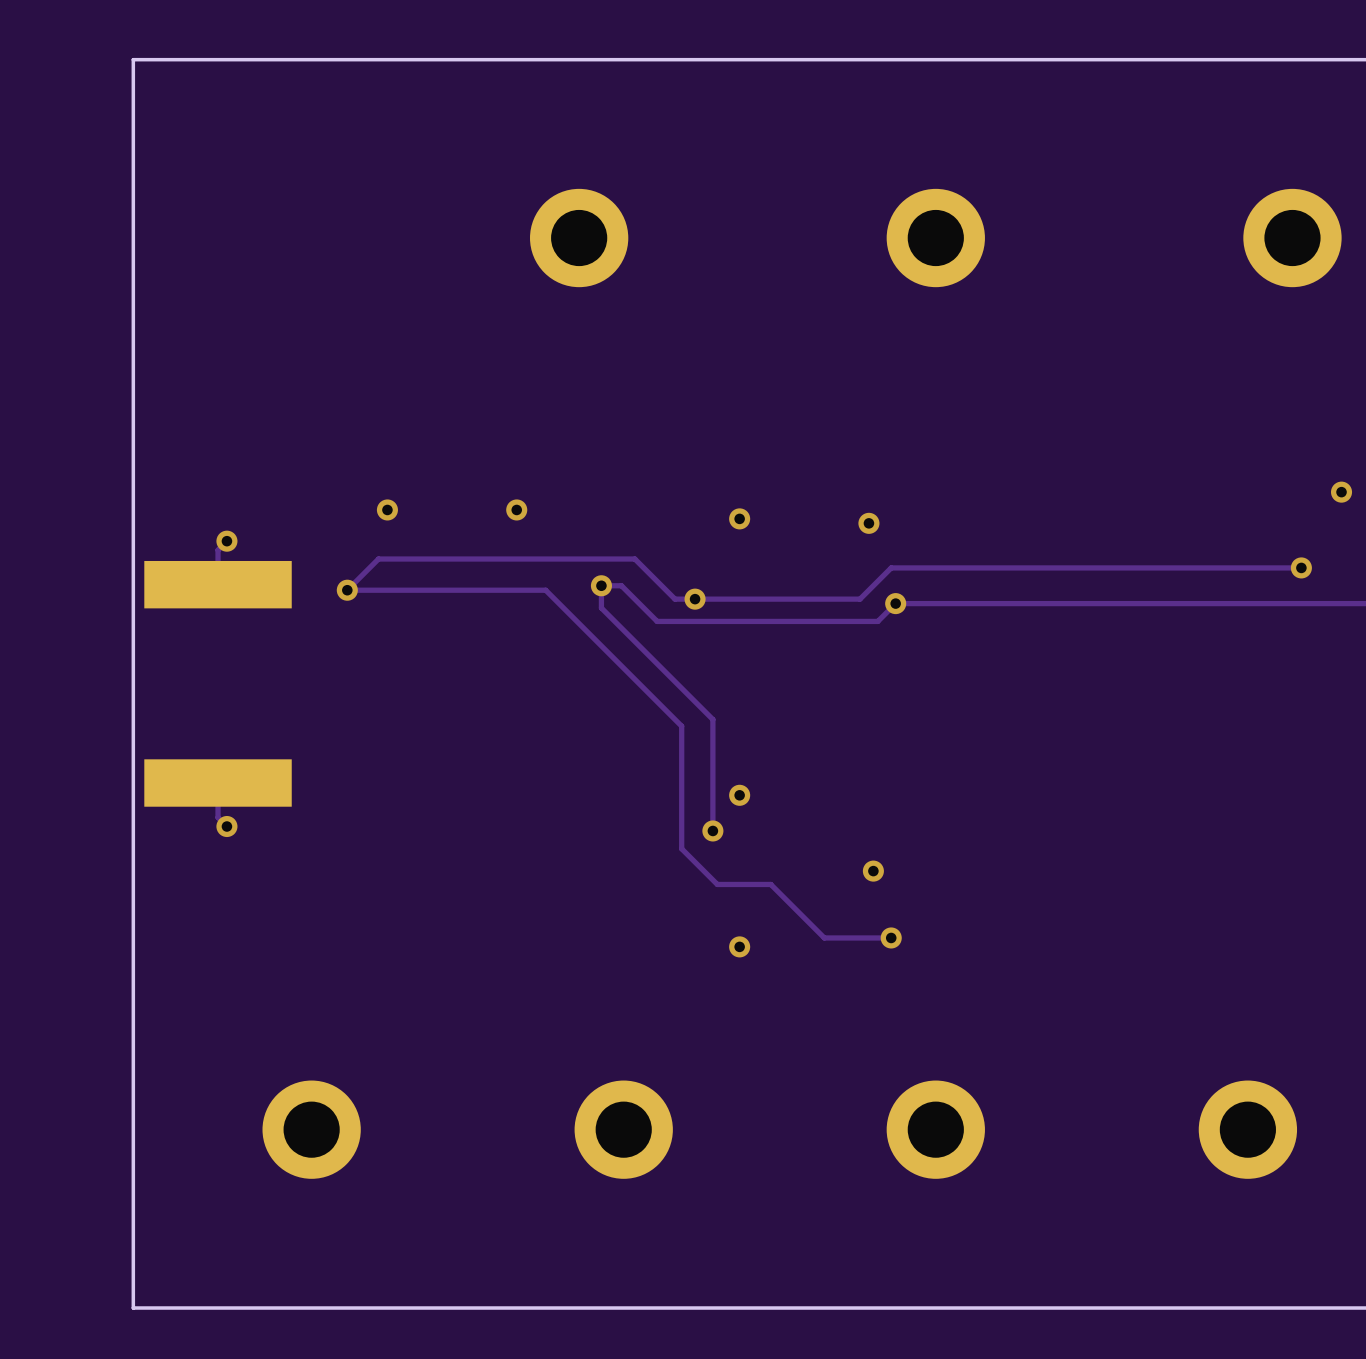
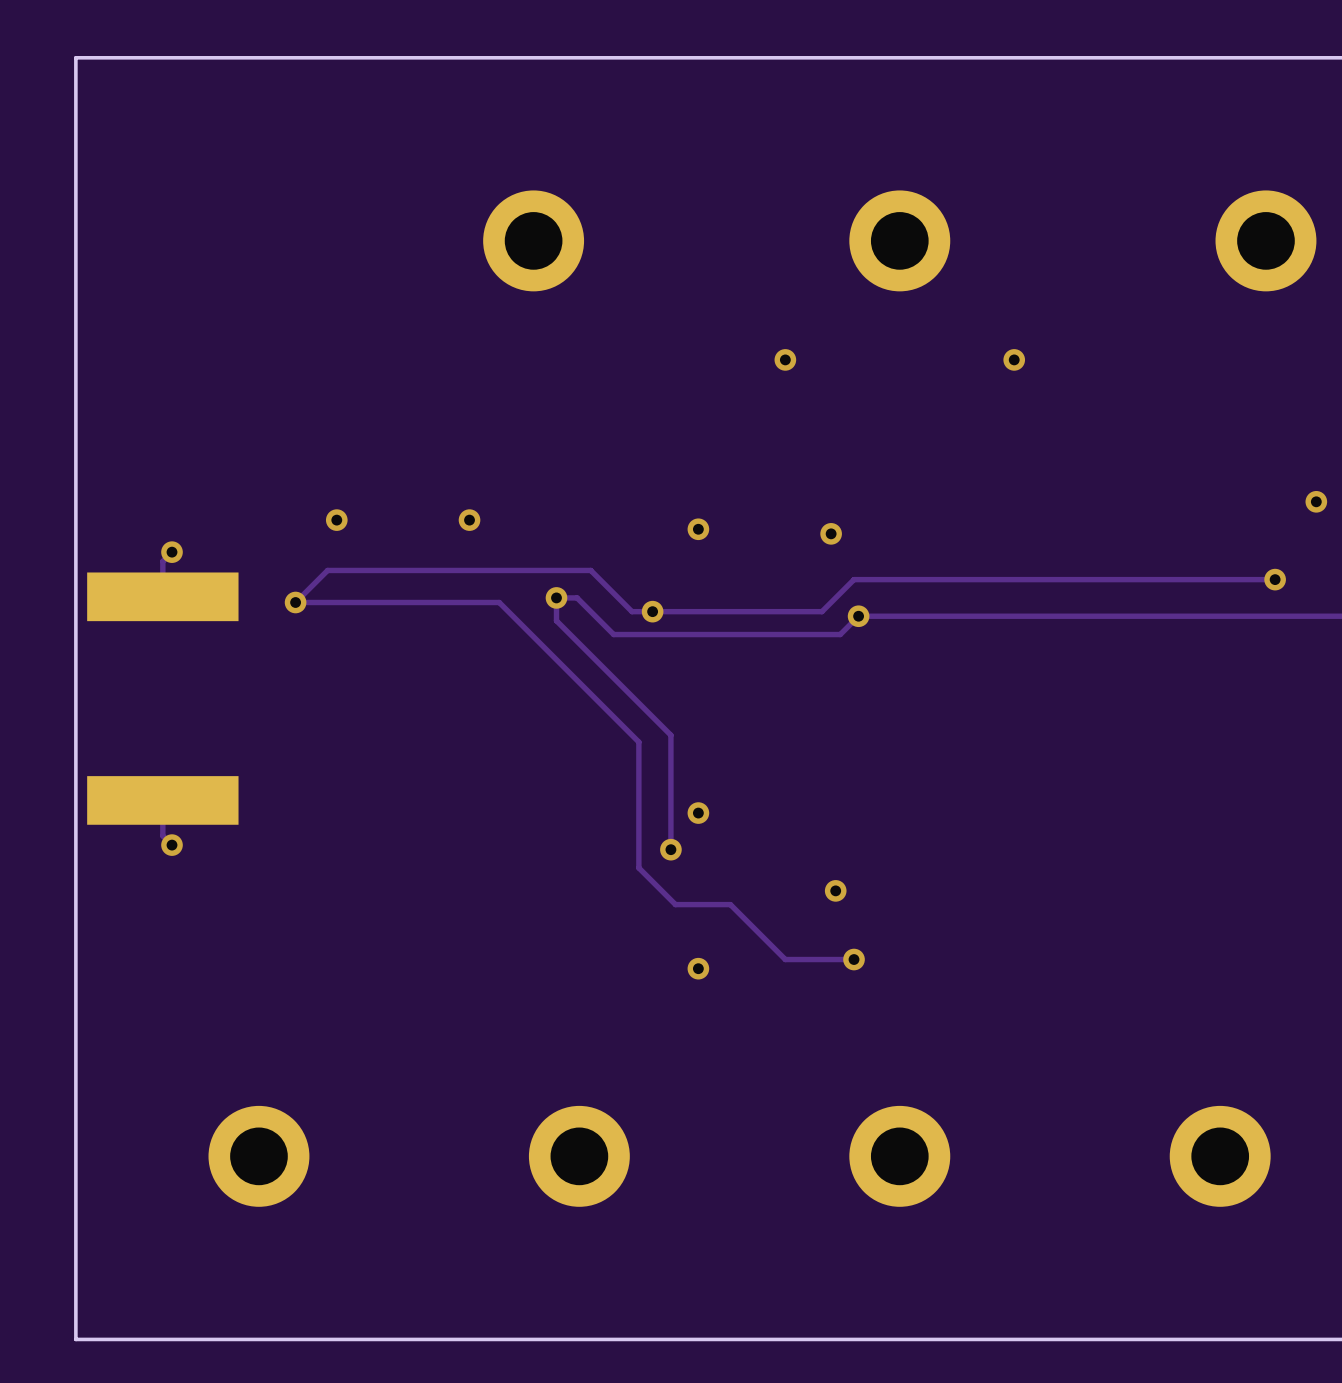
via: none -> (785, 359)
via: none -> (1014, 359)

